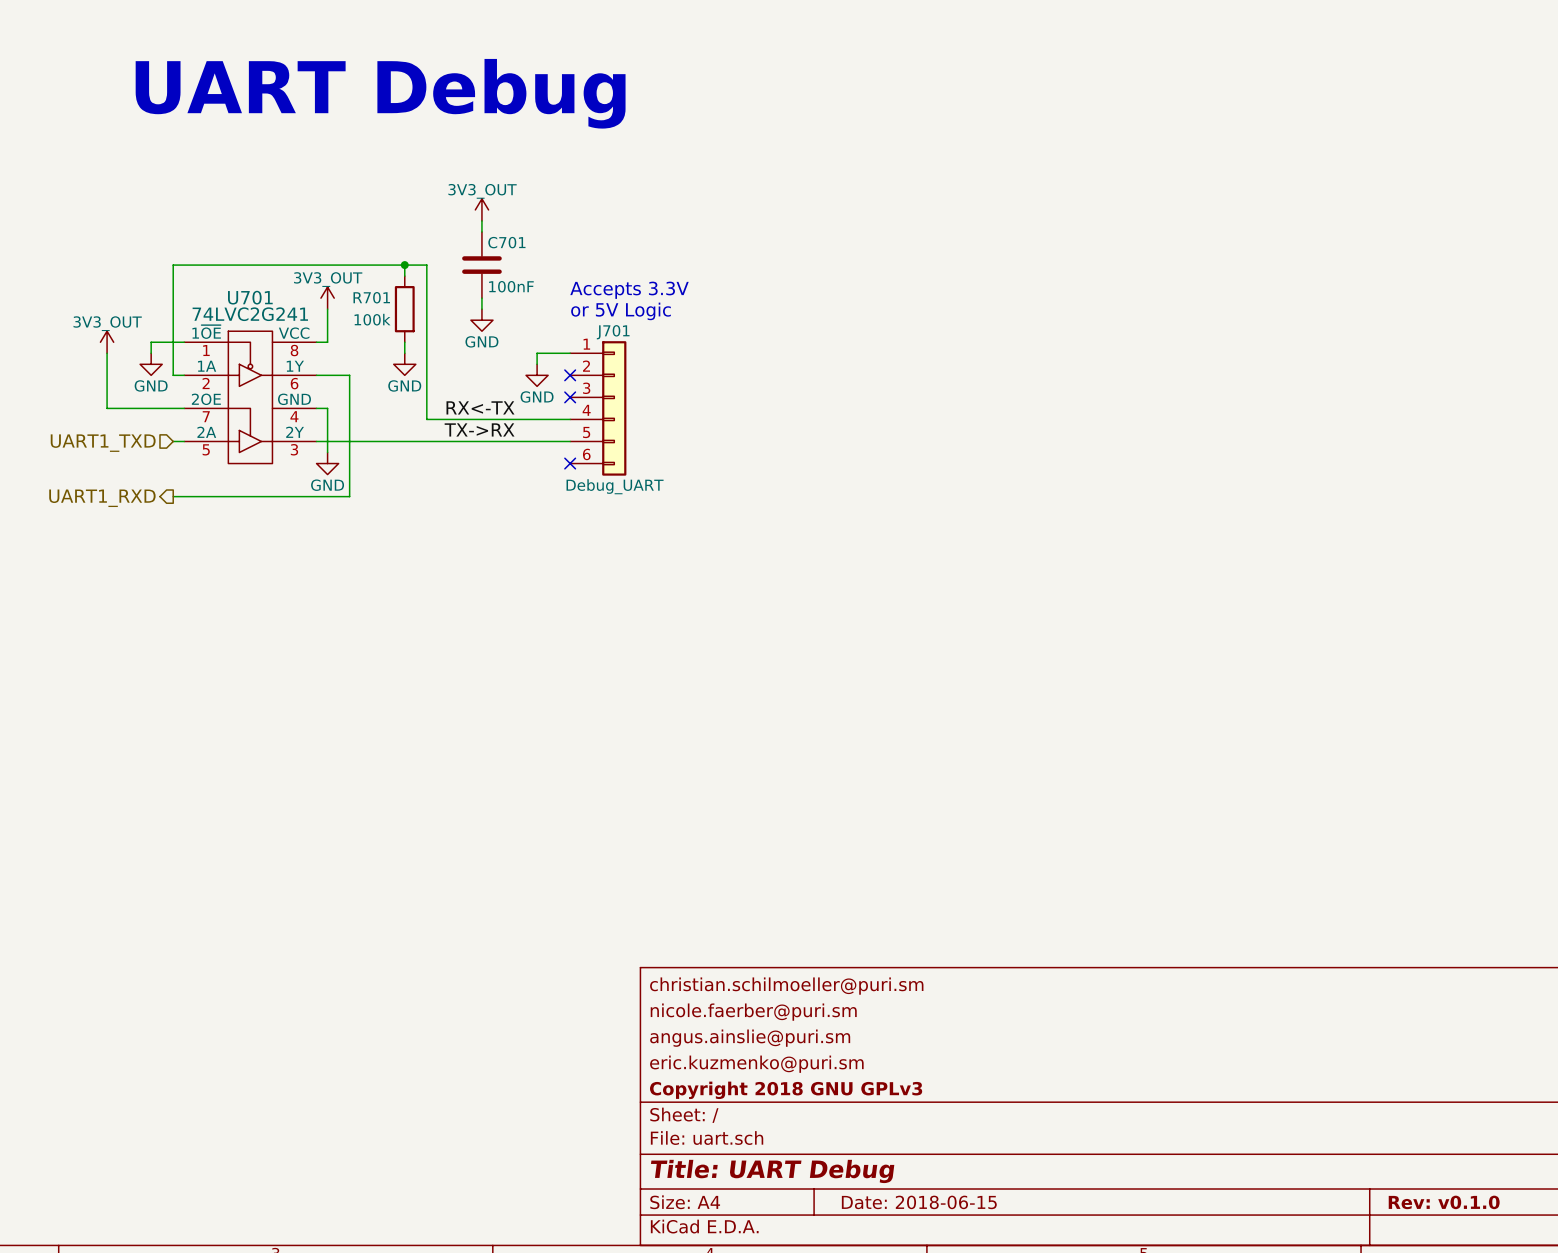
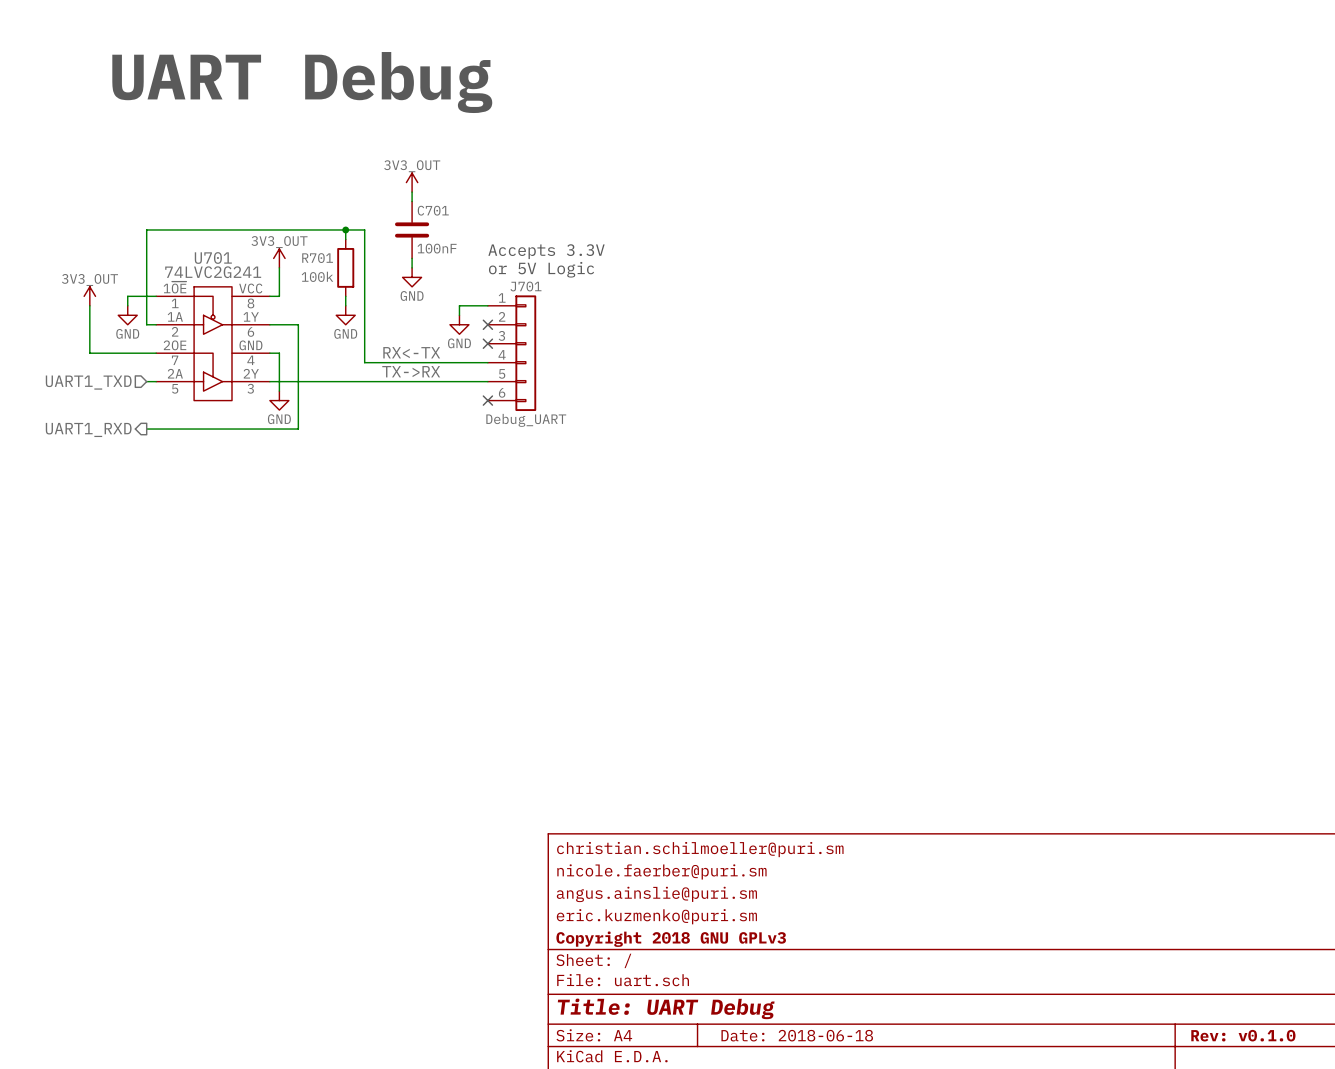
title block: Date: 2018-06-15 (919, 1202) -> Date: 2018-06-18 (797, 1035)

